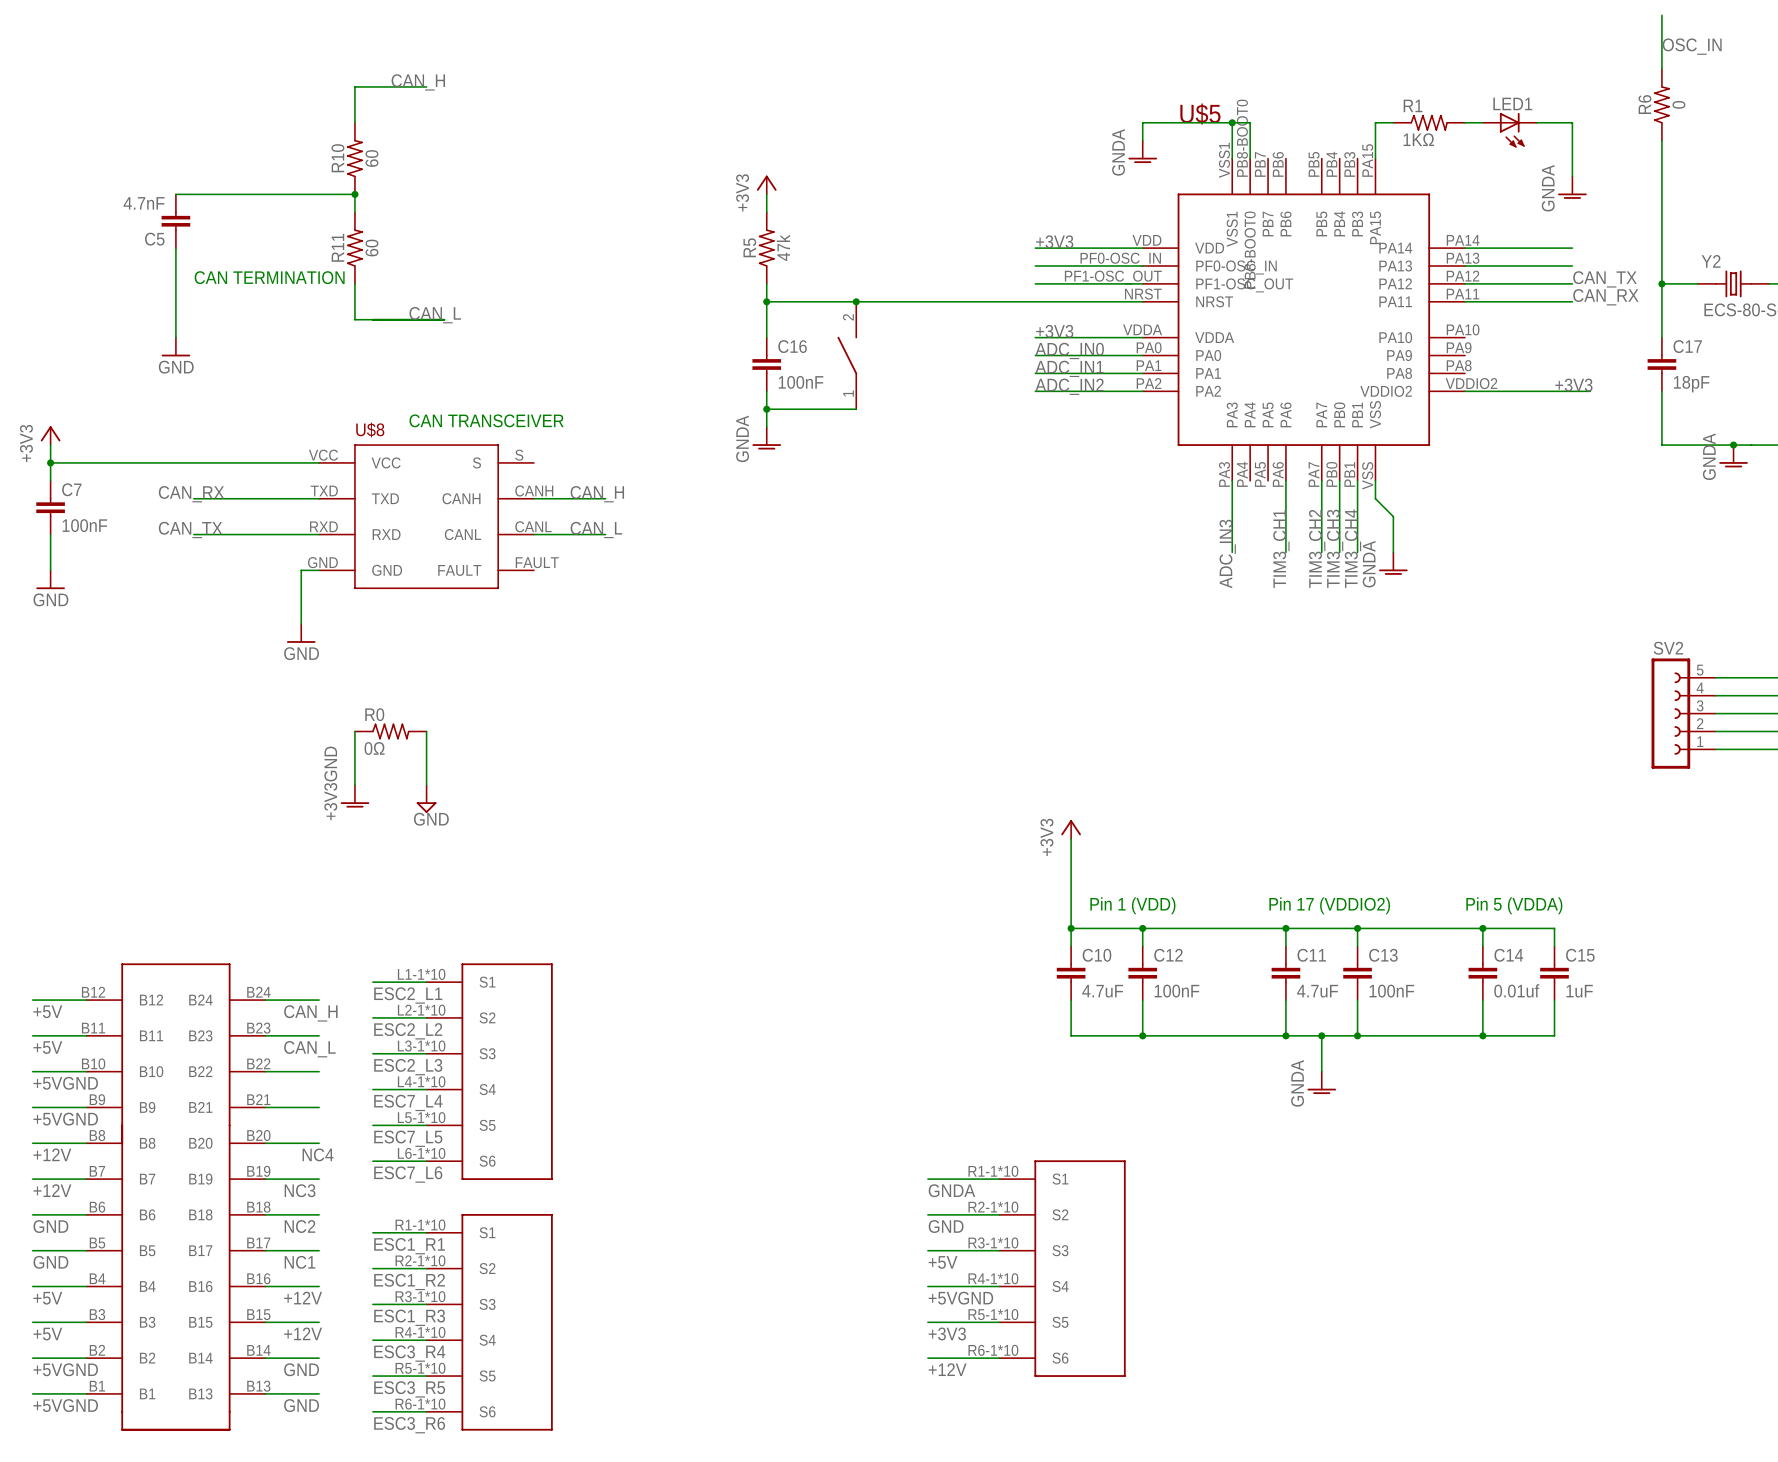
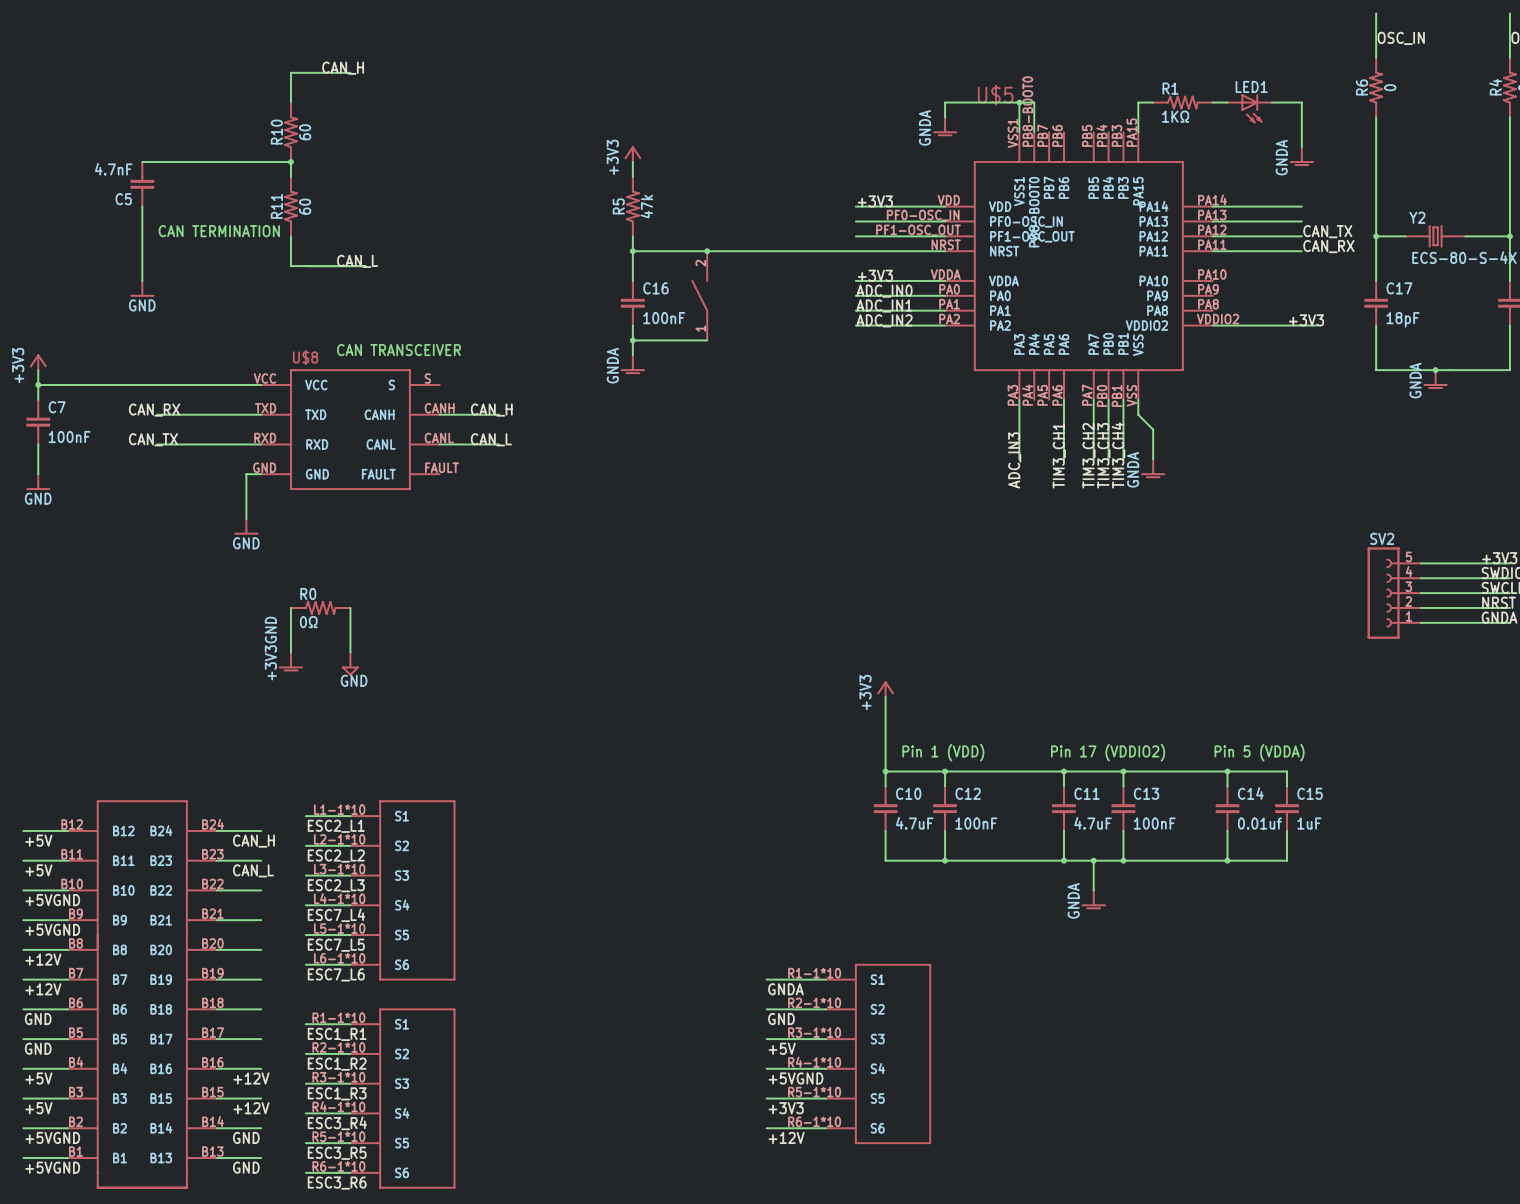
label: NC4 (318, 1154) -> none
label: NC3 (300, 1190) -> none
label: NC2 (300, 1226) -> none
label: NC1 (300, 1262) -> none

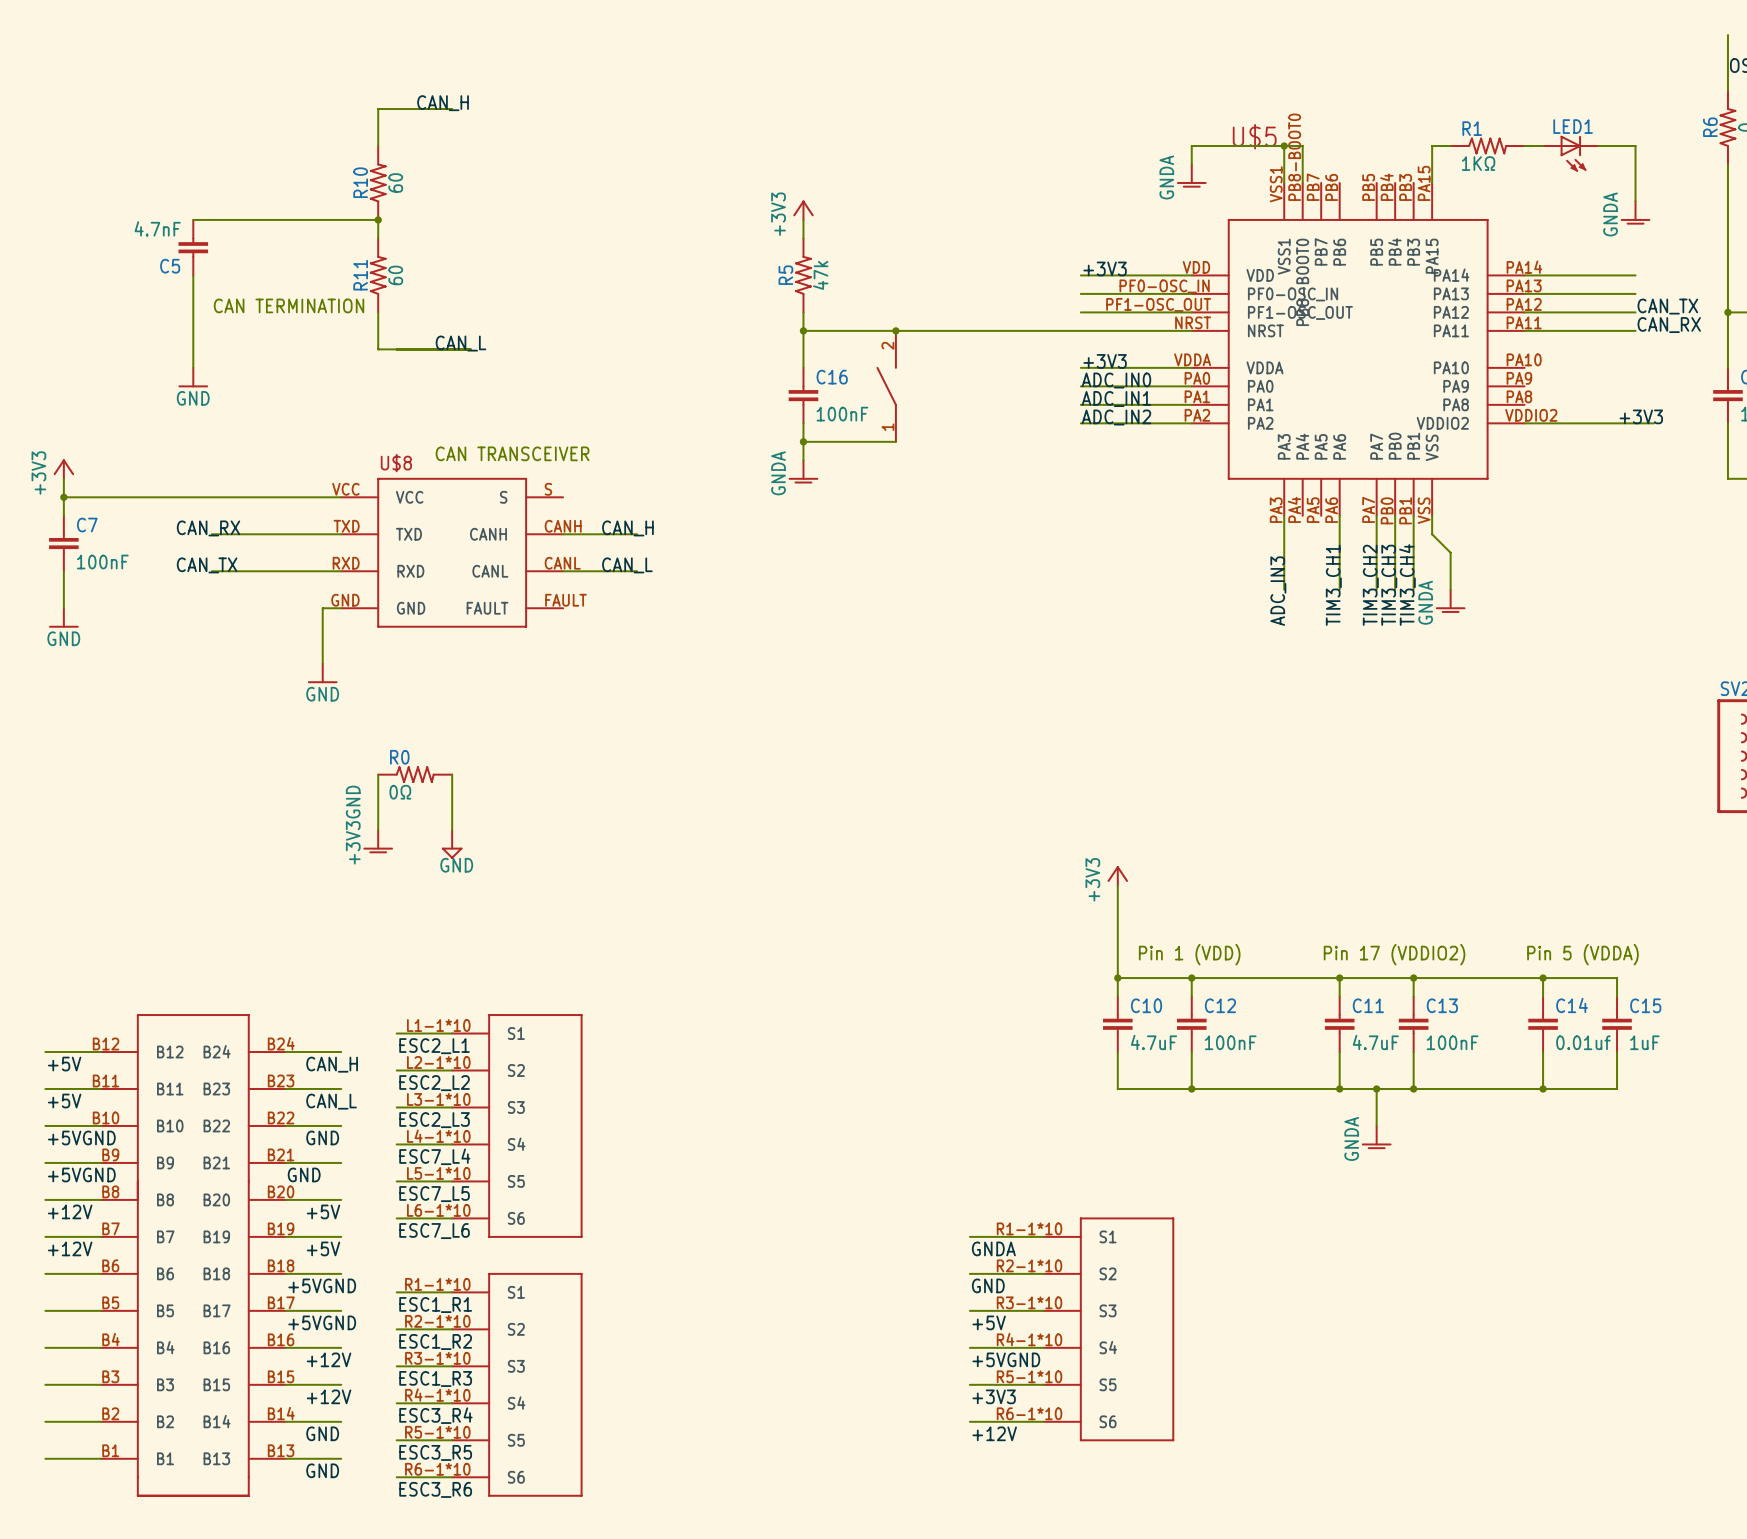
label: none -> GND (322, 1137)
label: none -> GND (304, 1174)
label: none -> +5V (323, 1211)
label: none -> +5V (323, 1248)
label: GND (38, 1019) -> none
label: none -> +5VGND (322, 1285)
label: GND (38, 1048) -> none
label: none -> +5VGND (322, 1322)
label: +5V (38, 1078) -> none
label: +5V (38, 1108) -> none
label: +5VGND (52, 1137) -> none
label: +5VGND (52, 1167) -> none

